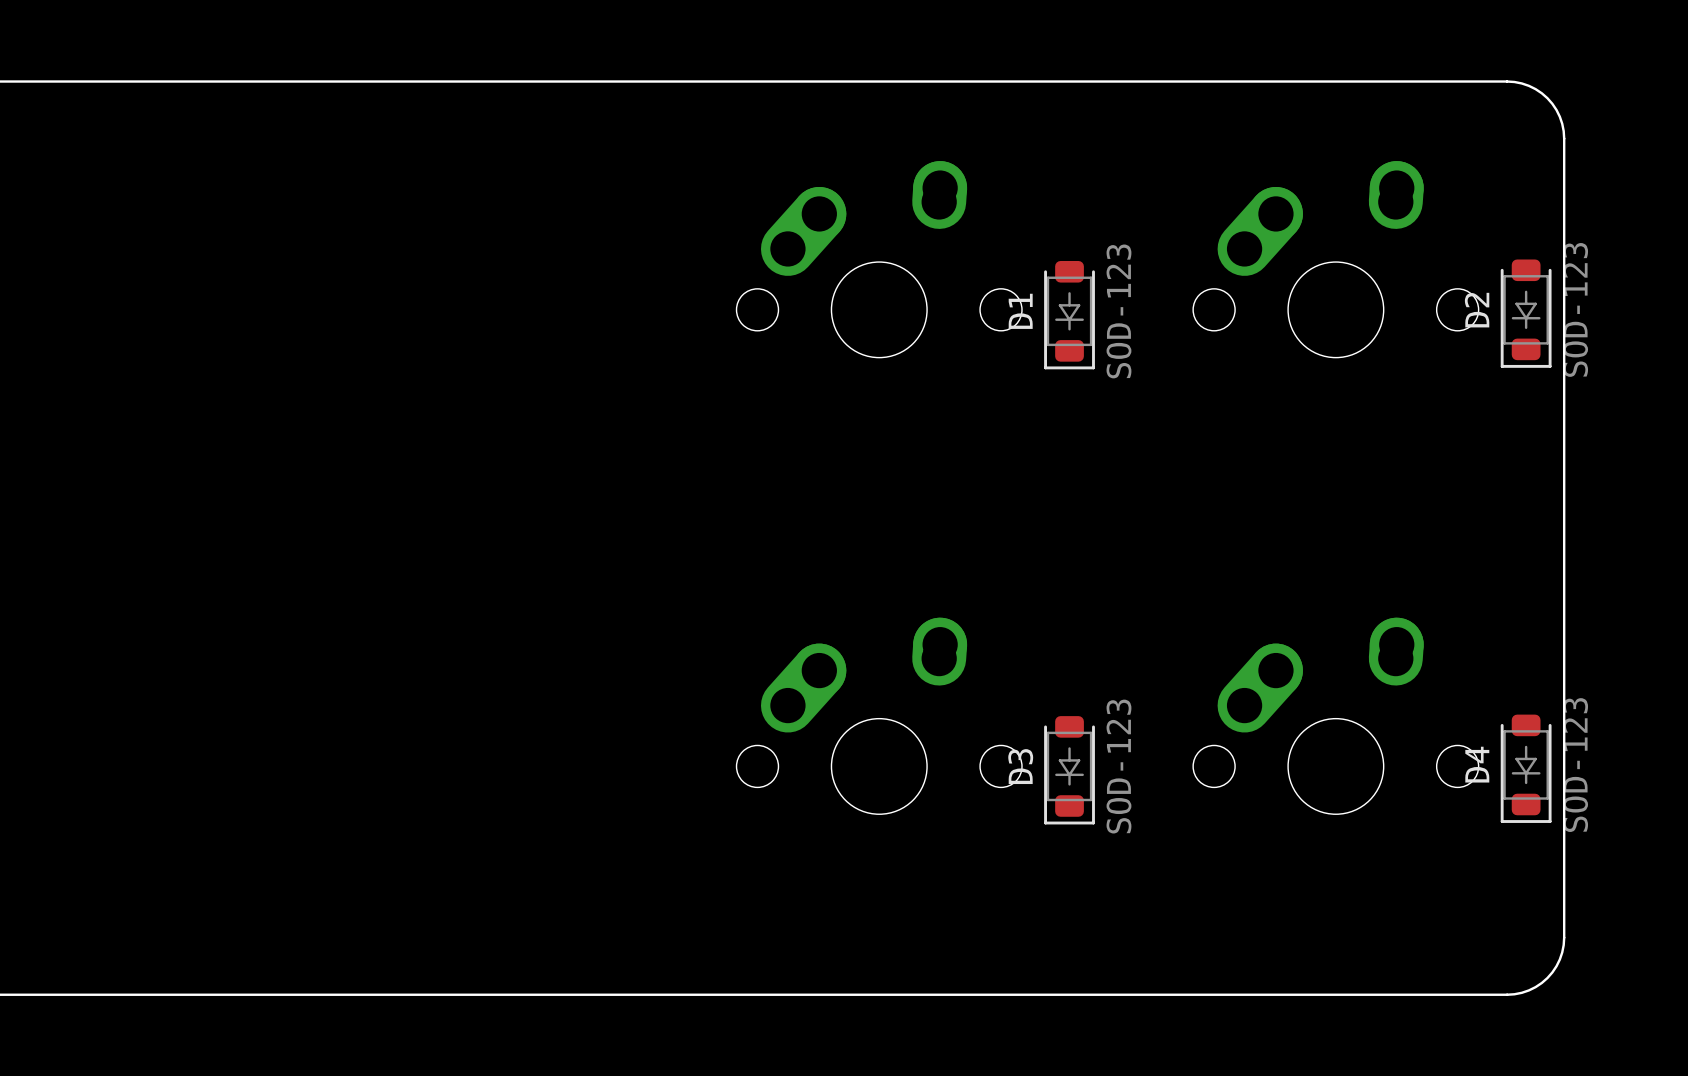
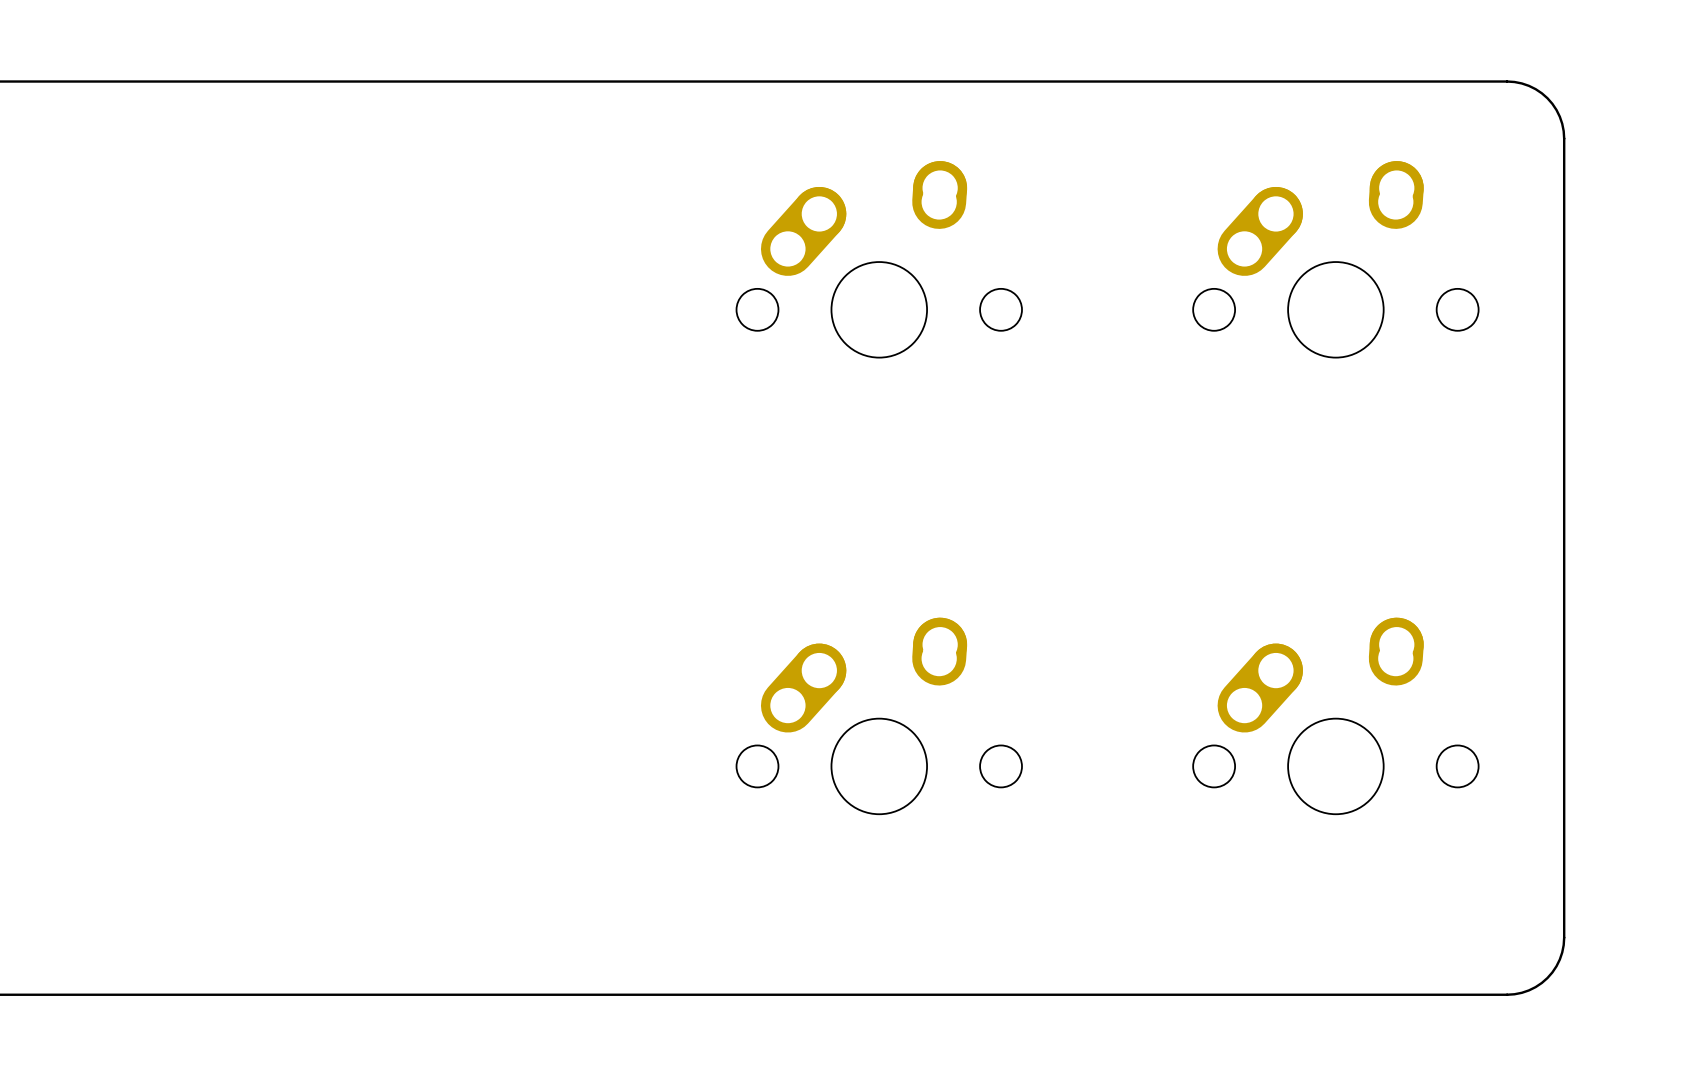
D2: SOD-123 (1526, 313) -> none
D1: SOD-123 (1069, 315) -> none
D4: SOD-123 (1526, 768) -> none
D3: SOD-123 (1069, 770) -> none

